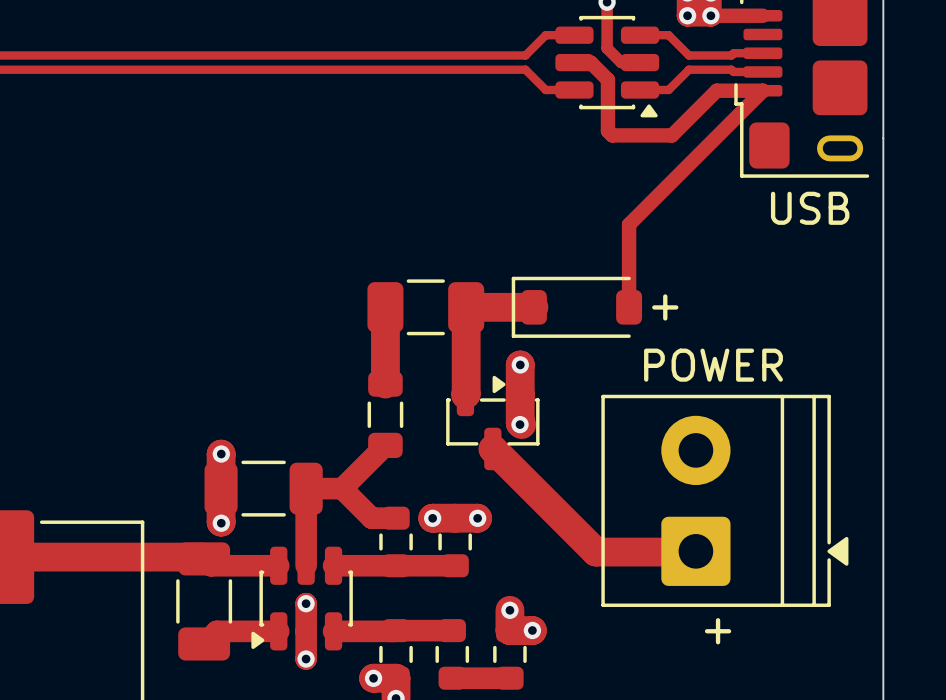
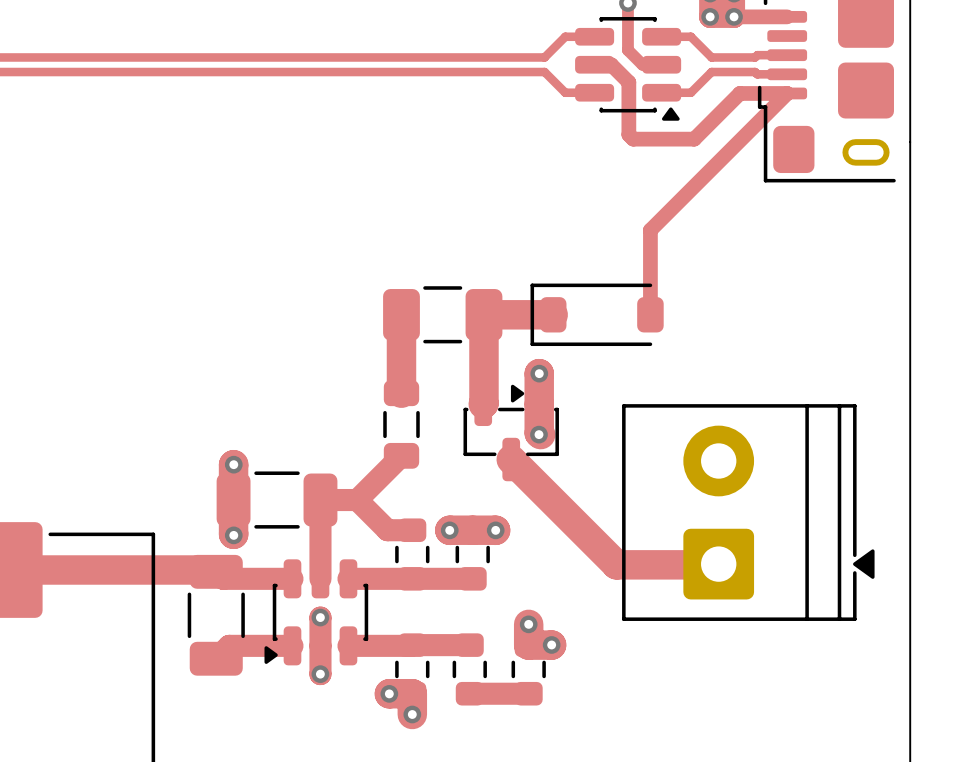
text: USB (810, 208) -> none
text: + (665, 307) -> none
text: POWER (713, 365) -> none
text: + (718, 631) -> none

